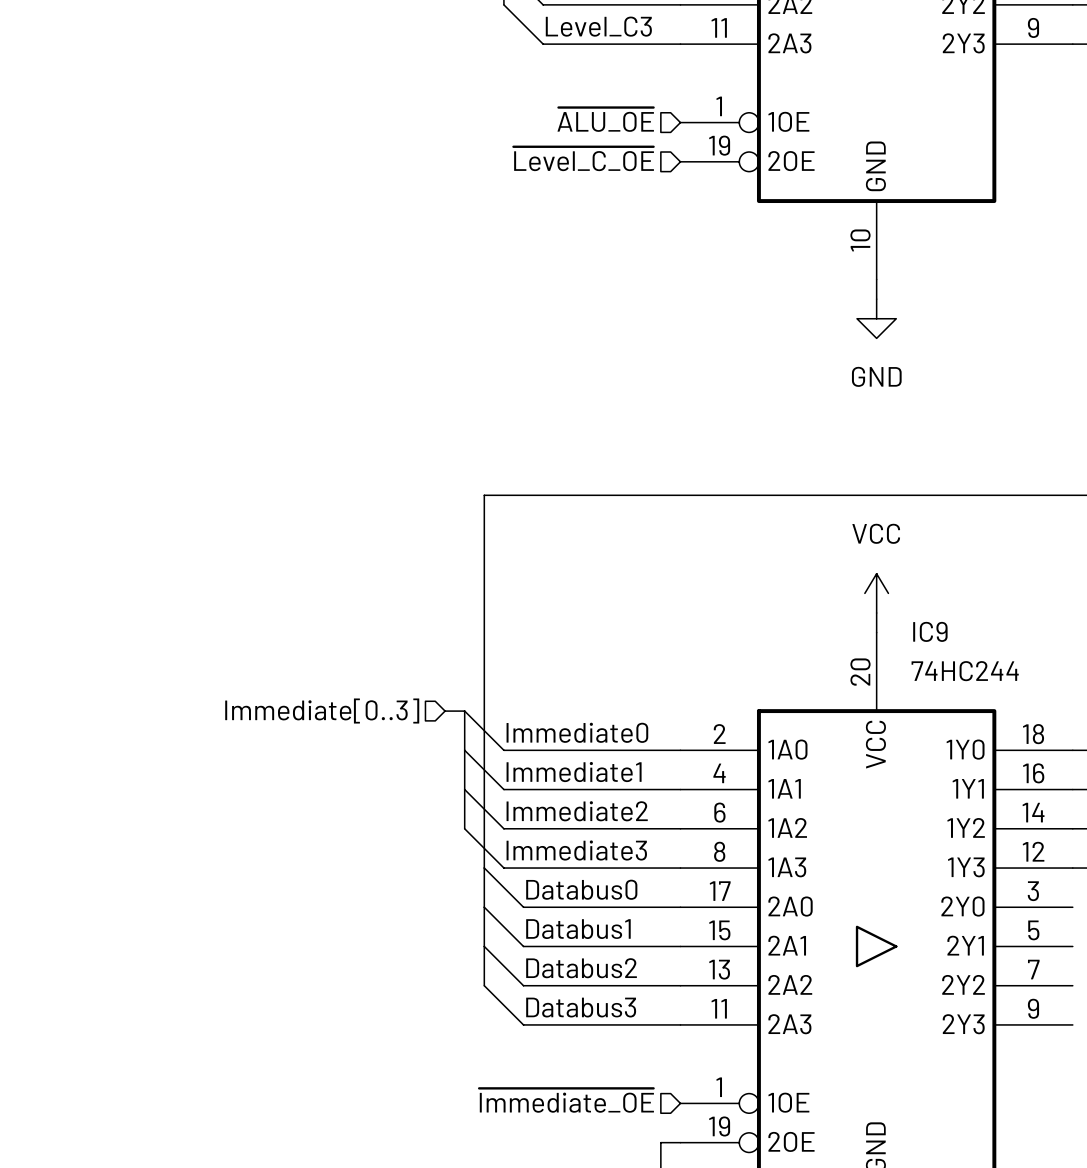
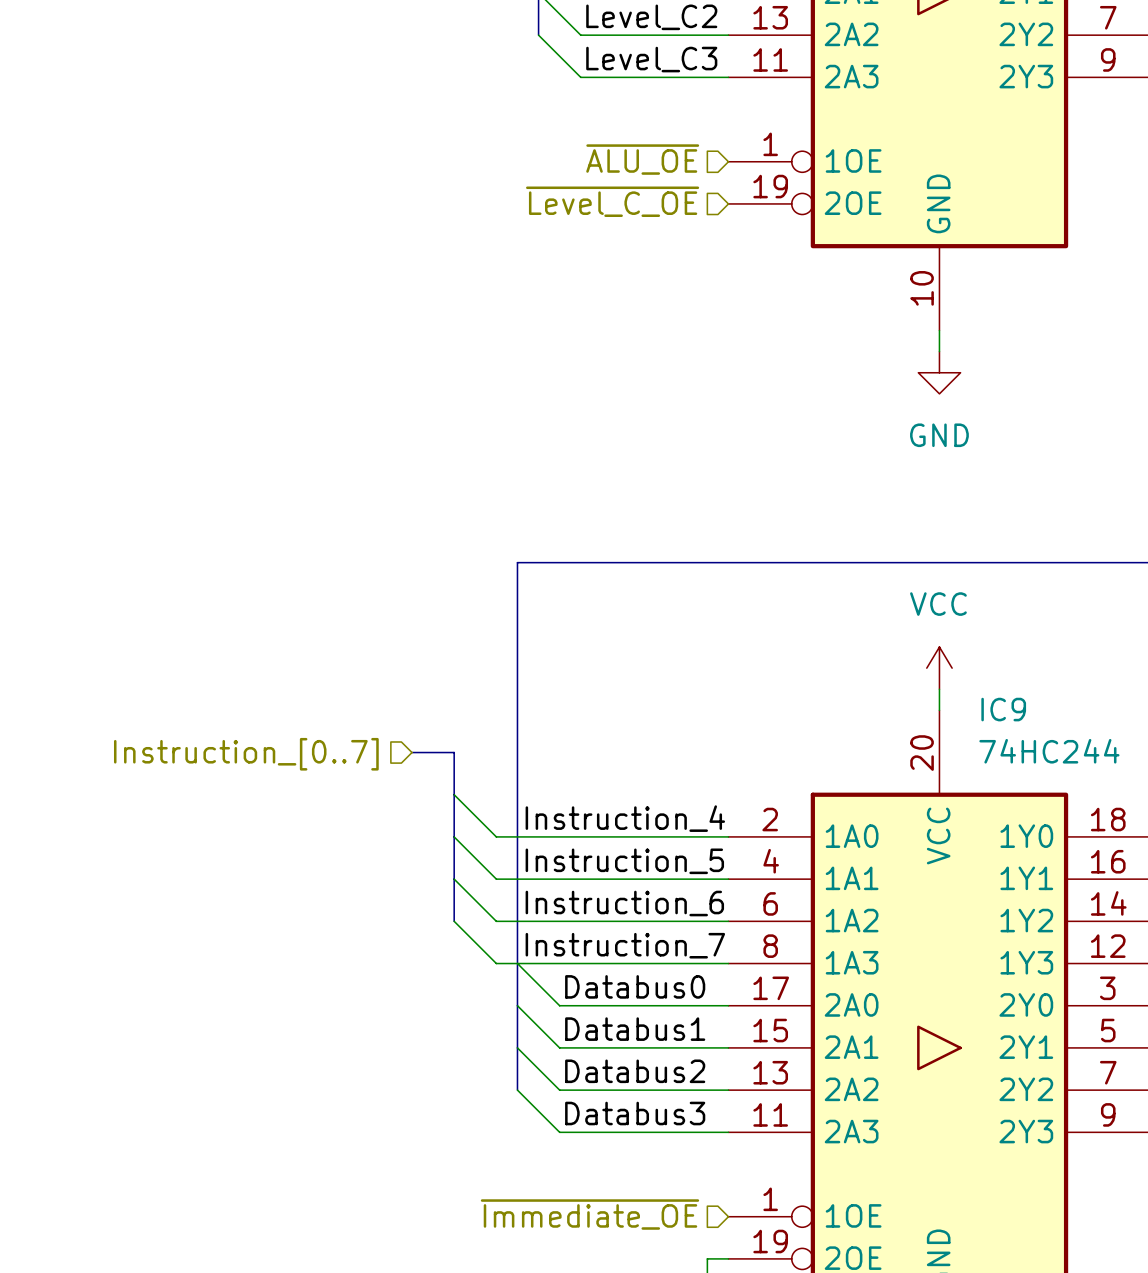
hierarchical label: none -> Instruction_[0..7] (246, 754)
bus: none -> (411, 752) (454, 752) (454, 921)
hierarchical label: Immediate[0..3] (322, 711) -> none
bus: (445, 711) (464, 711) (464, 828) -> none
wire: (464, 711) (503, 750) -> (454, 794) (496, 836) (538, 836)
label: Immediate0 (577, 732) -> none
label: none -> Instruction_4 (625, 818)
wire: (464, 750) (503, 789) -> (454, 836) (496, 879) (538, 879)
label: Immediate1 (574, 772) -> none
label: none -> Instruction_5 (624, 861)
wire: (464, 789) (503, 828) -> (454, 879) (496, 921) (538, 921)
label: Immediate2 (577, 811) -> none
label: none -> Instruction_6 (624, 903)
wire: (464, 828) (503, 868) -> (454, 921) (496, 963) (538, 963)
label: Immediate3 (576, 850) -> none
label: none -> Instruction_7 (625, 945)

